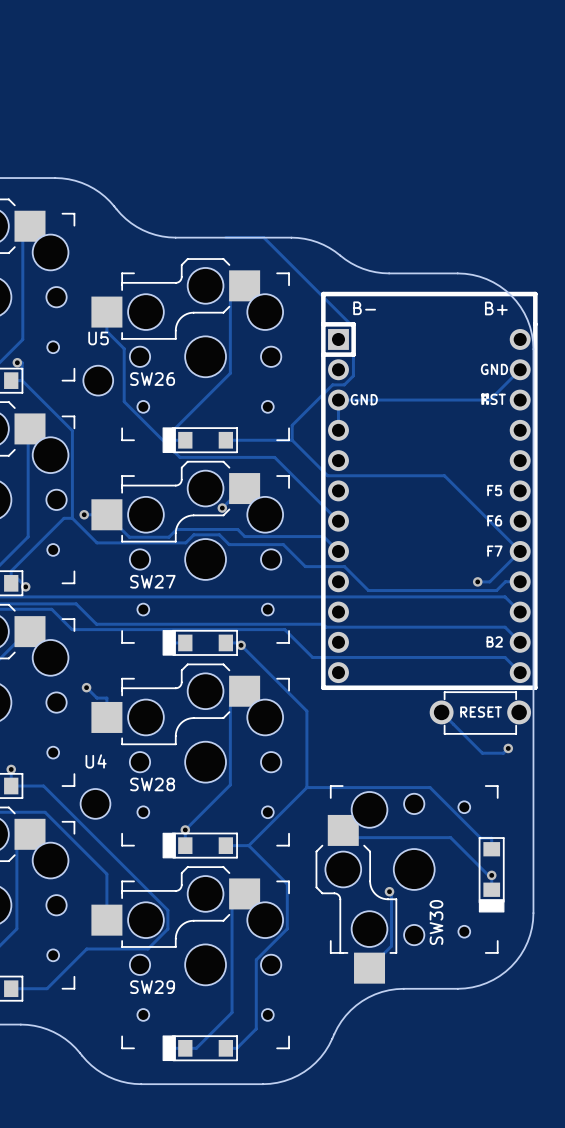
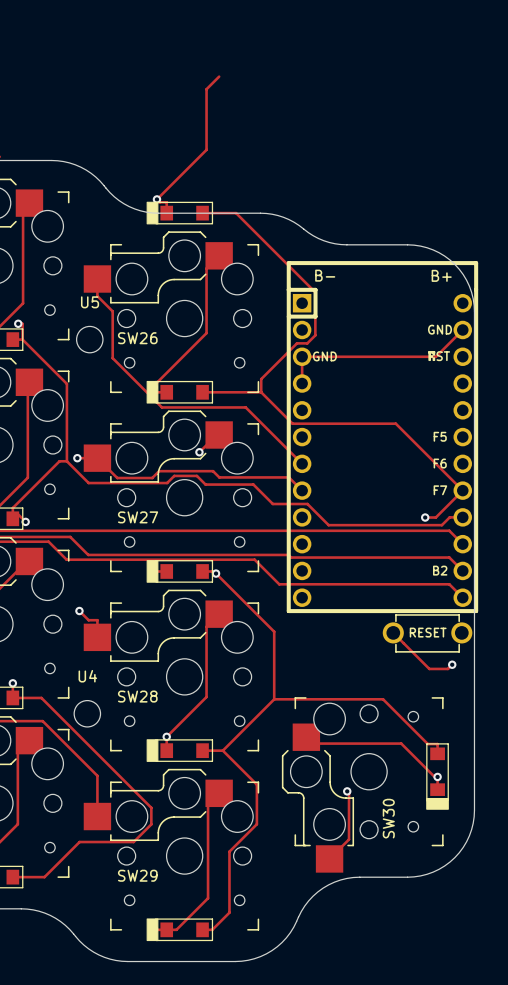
track: none -> (219, 76) (206, 89) (206, 149) (156, 199) (159, 202) (166, 202) (166, 213)
via: none -> (156, 199)
part: none -> (179, 213)

